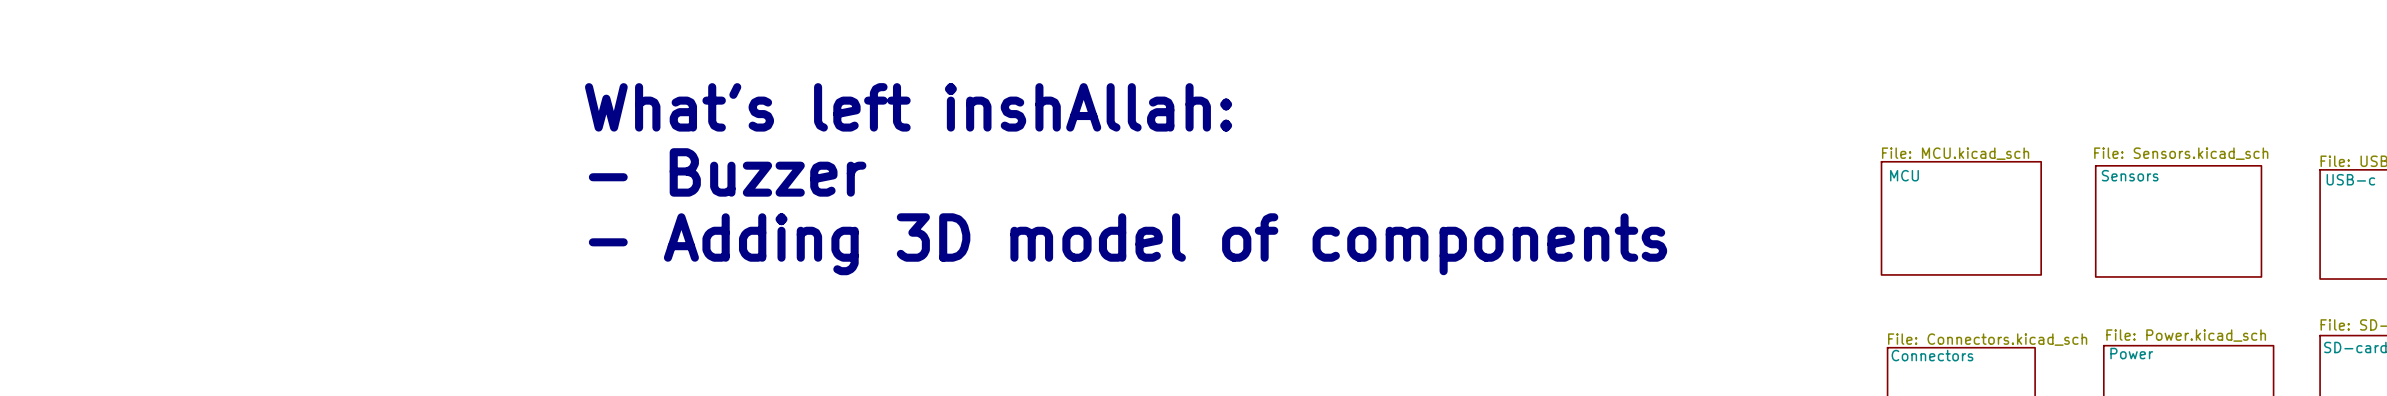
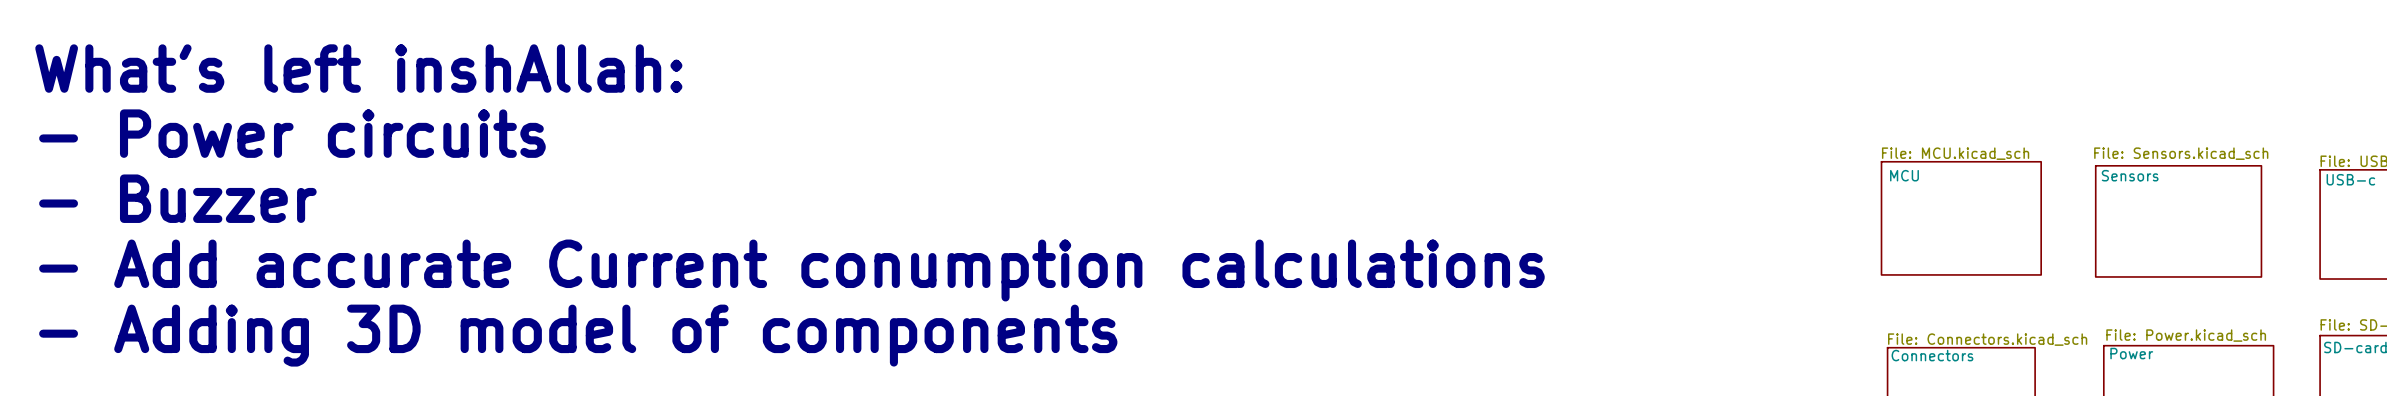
text: none -> What's left inshAllah: (358, 68)
text: What's left inshAllah: (908, 107) -> none
text: none -> - Power circuits (292, 133)
text: - Buzzer (727, 172) -> none
text: none -> - Buzzer (177, 198)
text: - Adding 3D model of components (1127, 244) -> none
text: none -> - Add accurate Current conumption calculations (791, 270)
text: none -> - Adding 3D model of components (578, 335)

